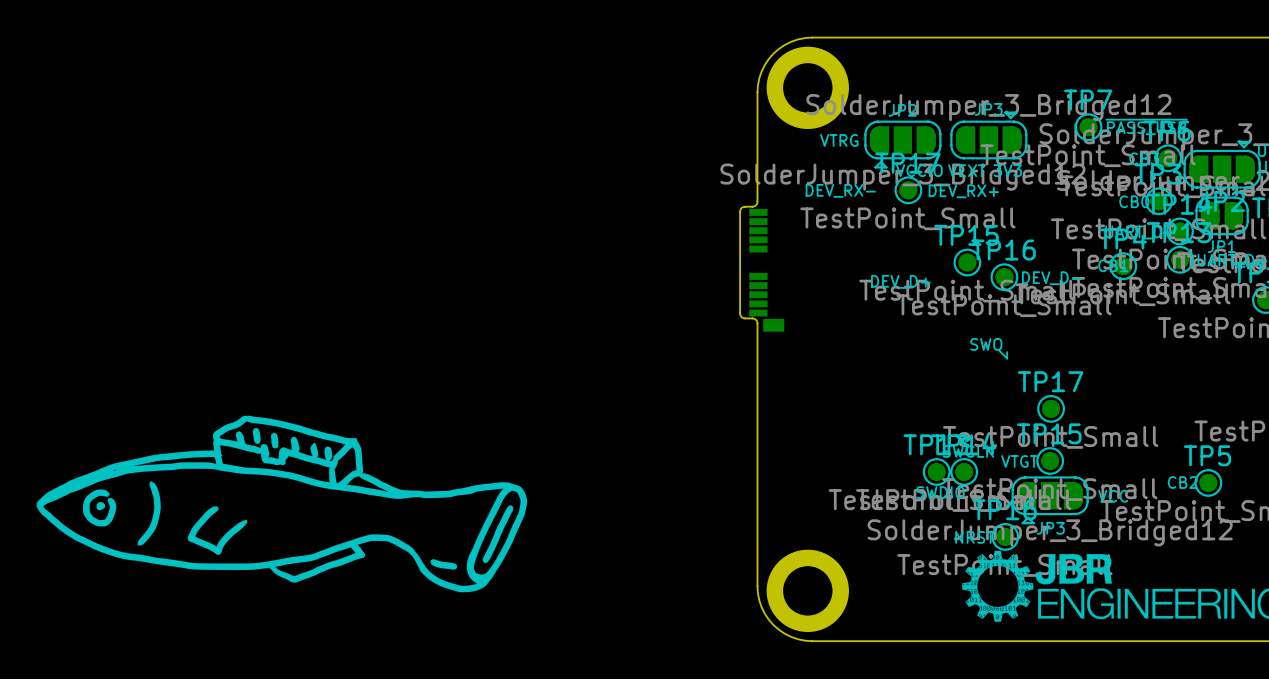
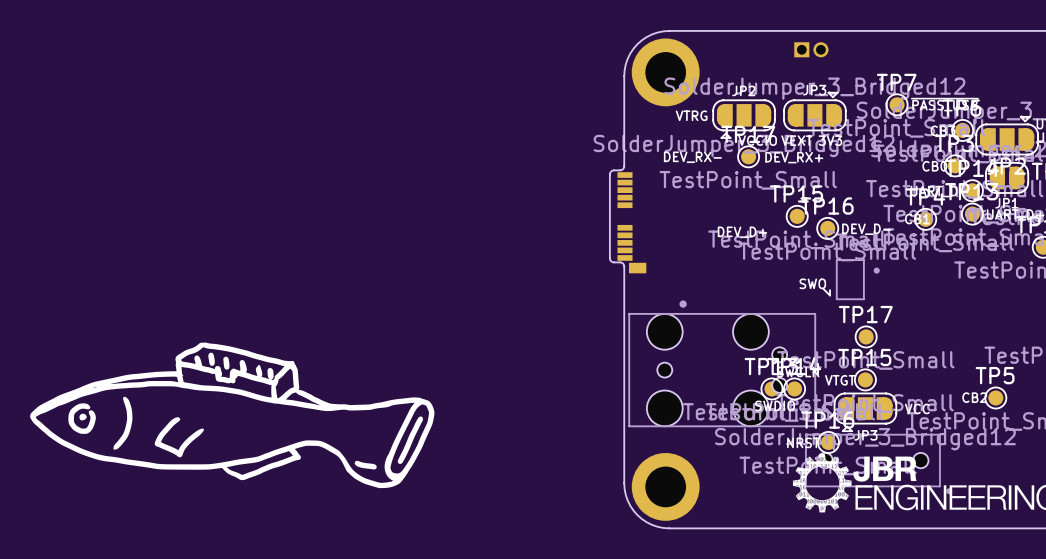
part: none -> (811, 49)
part: none -> (857, 279)
part: none -> (722, 363)
part: none -> (878, 464)

